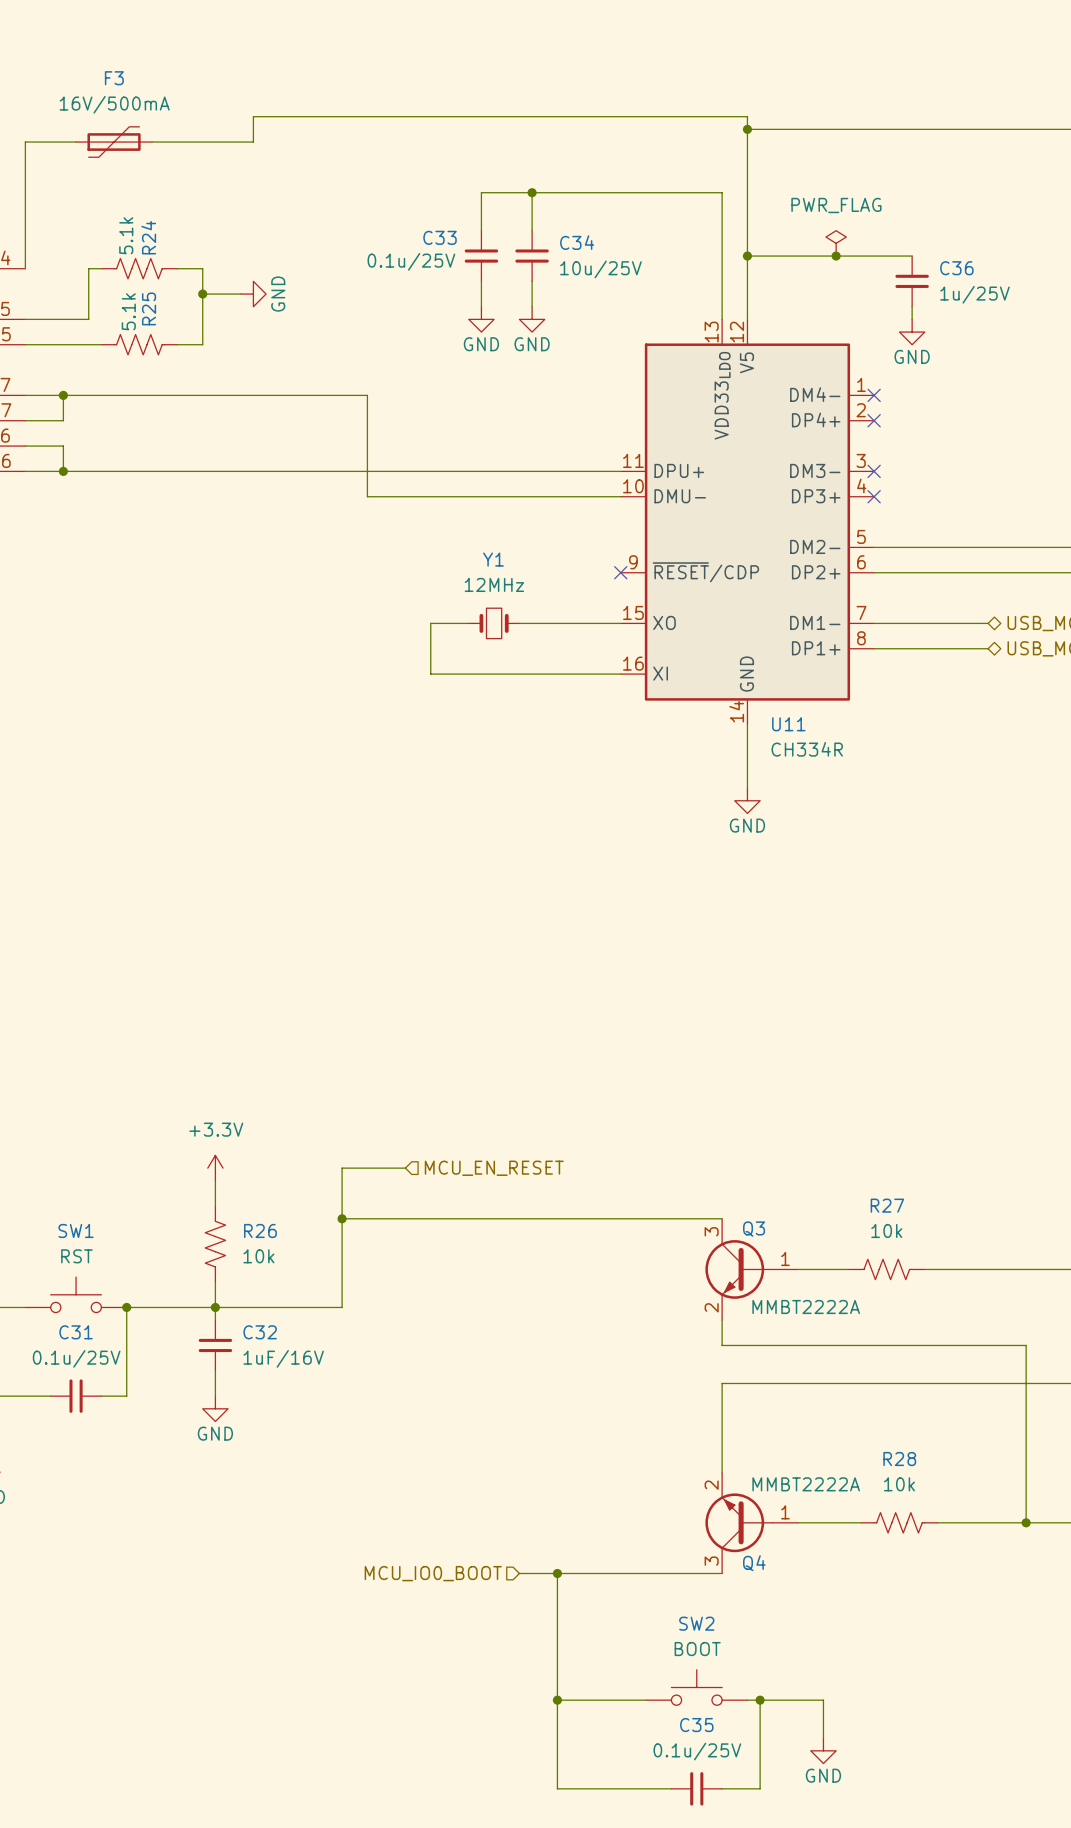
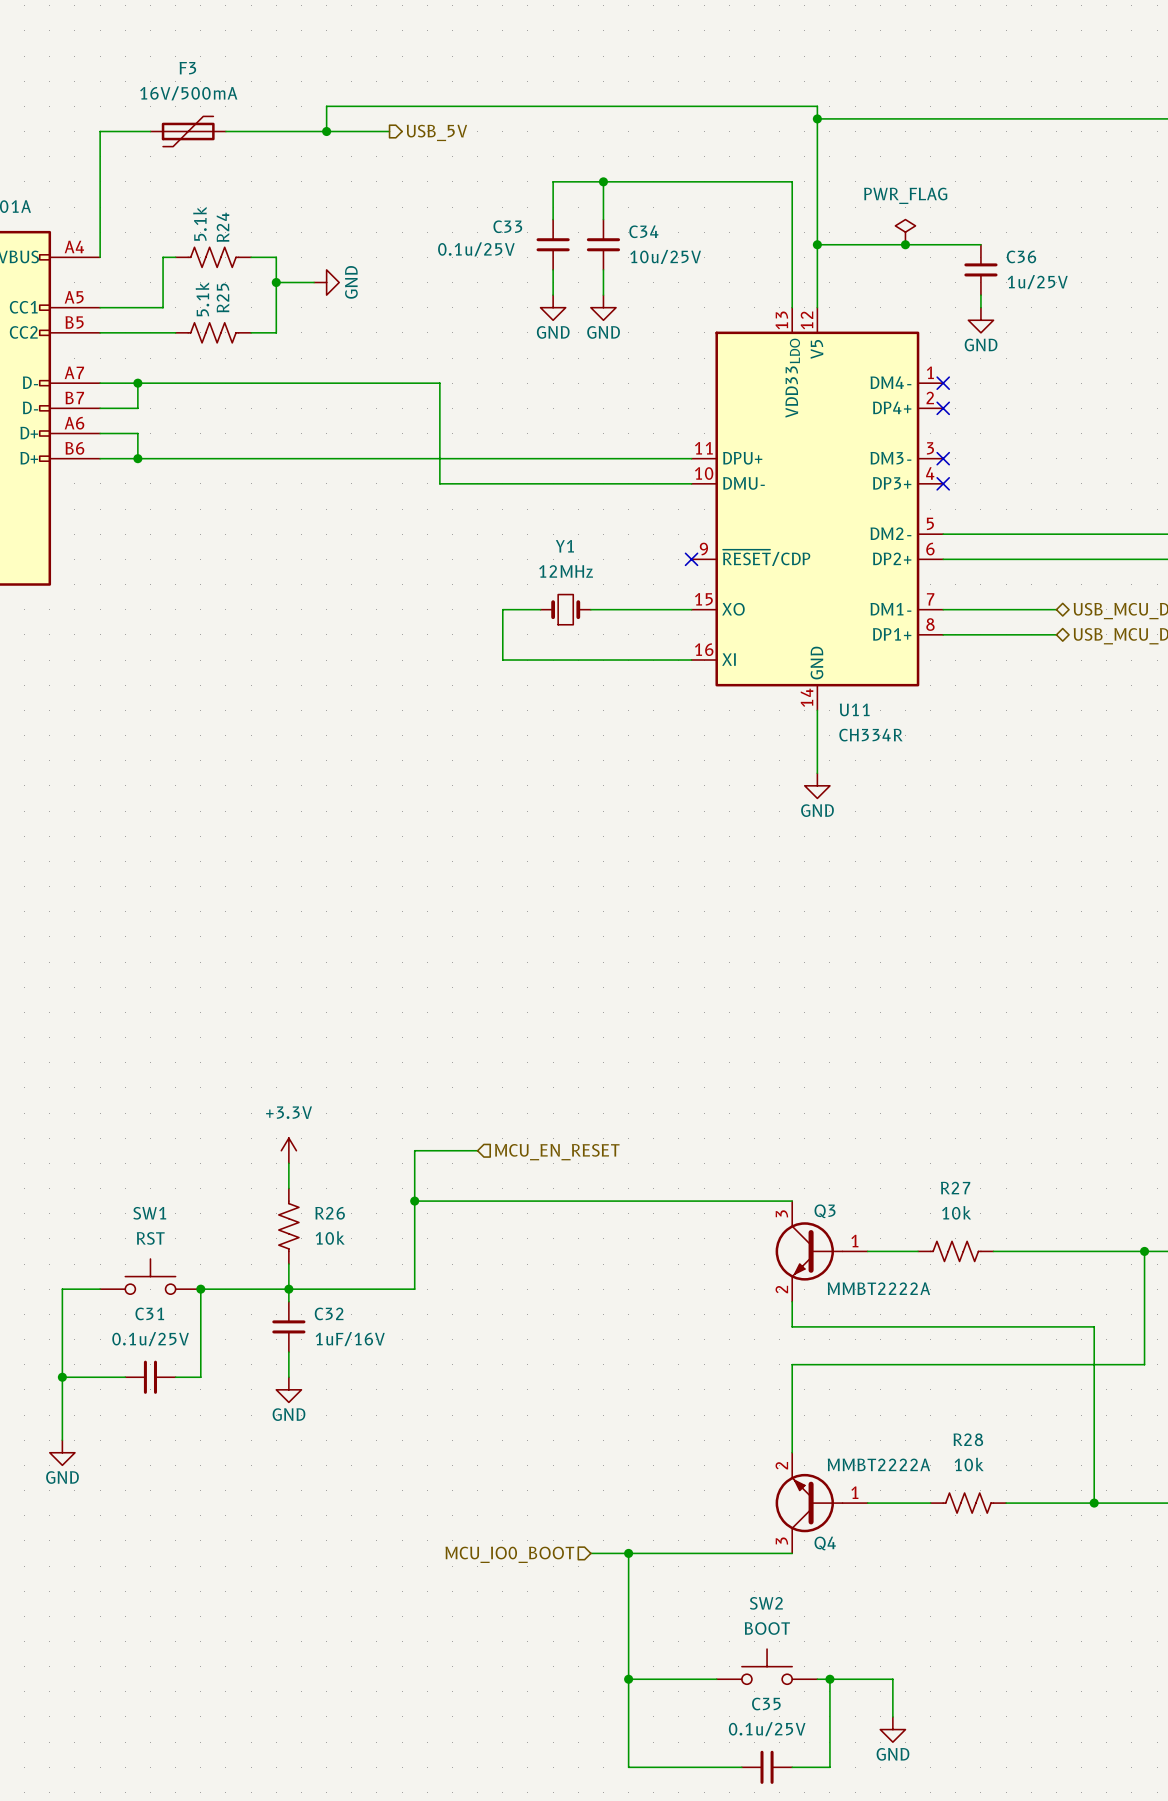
wire: none -> (326, 131) (389, 131)
junction: none -> (326, 131)
hierarchical label: none -> USB_5V (436, 132)

